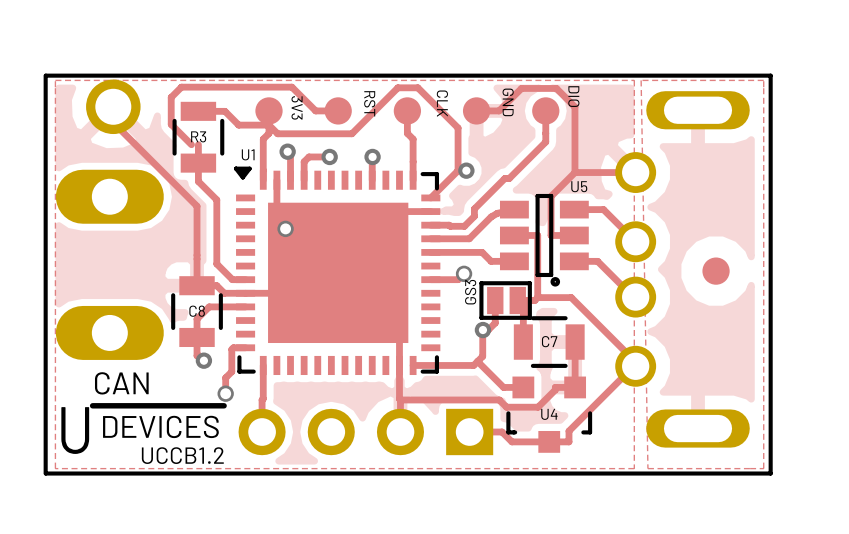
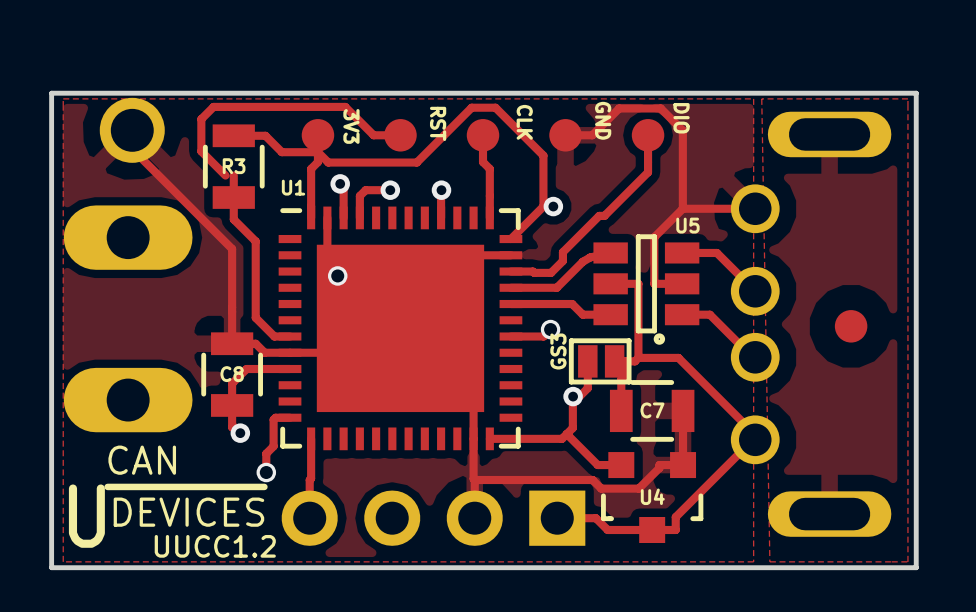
U1 footprint: [233, 166, 441, 376] -> [278, 206, 523, 451]
text: UCCB1.2 (182, 455) -> UUCC1.2 (215, 546)

